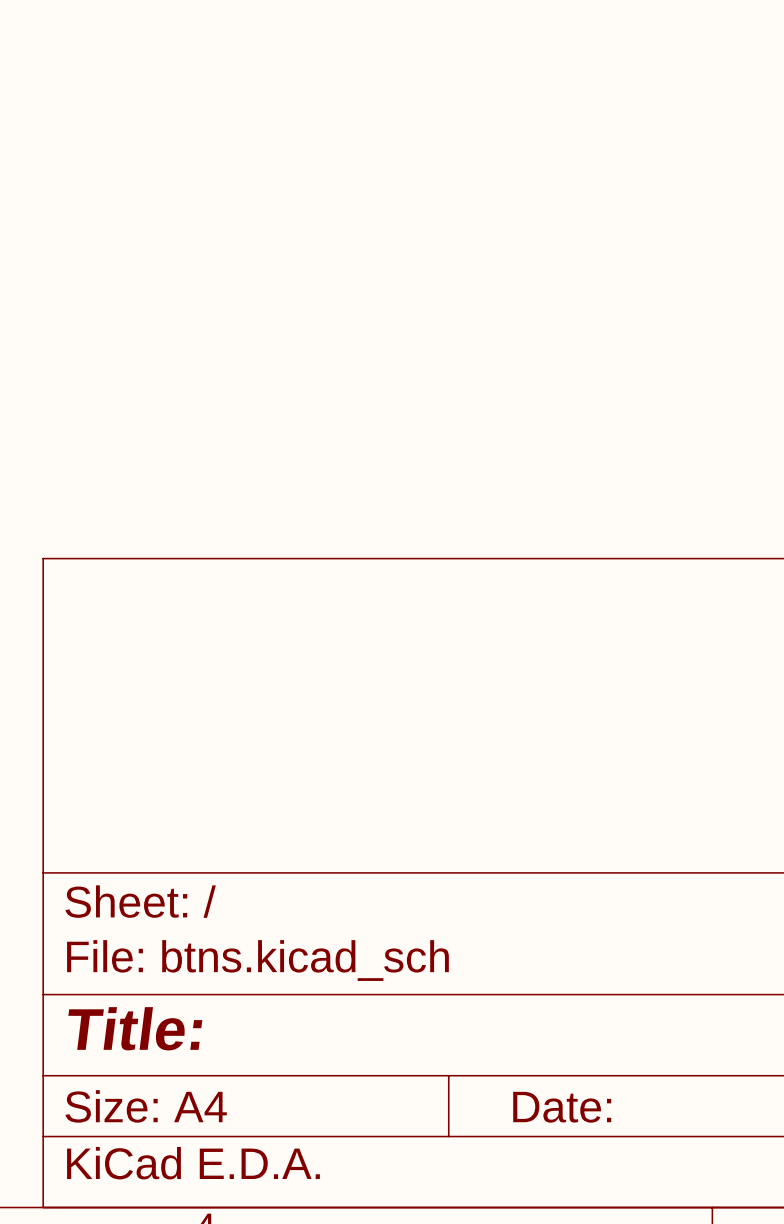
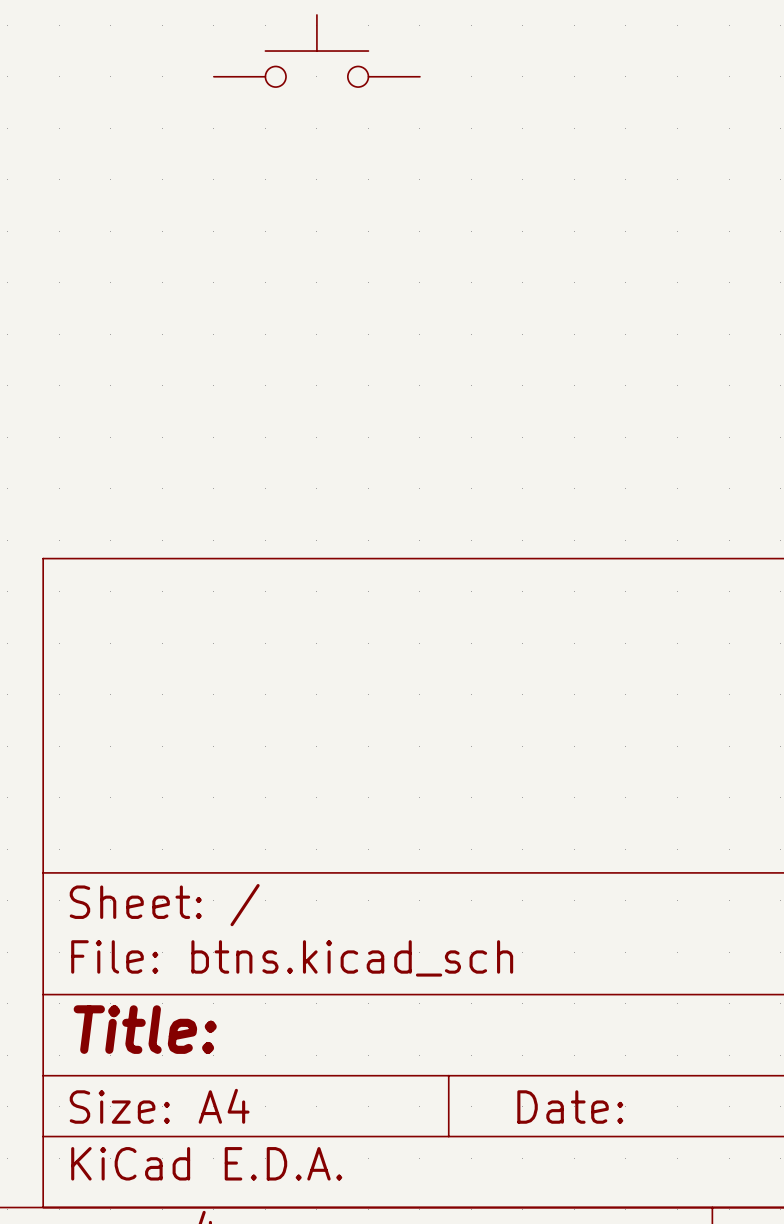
part: none -> (316, 51)

